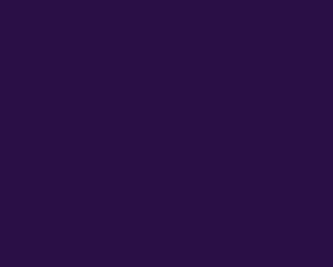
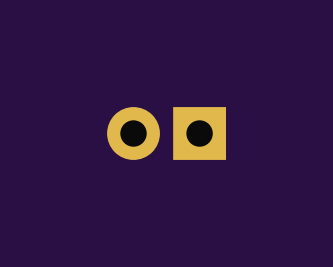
part: none -> (166, 133)

